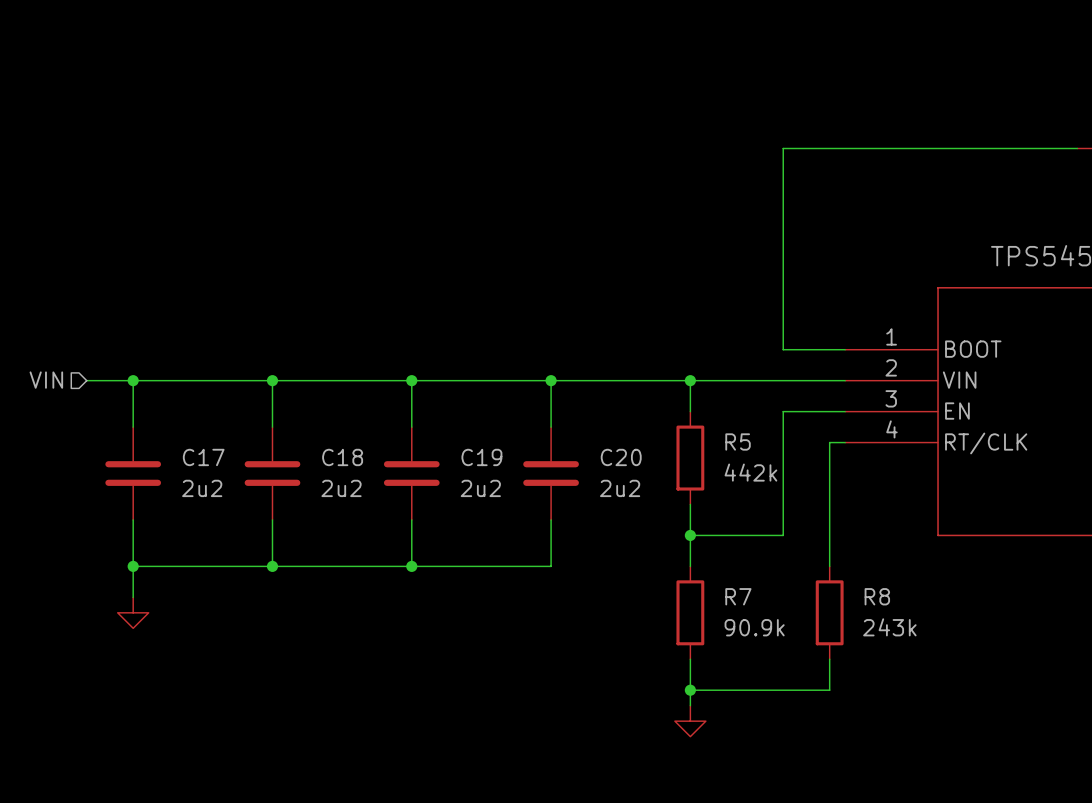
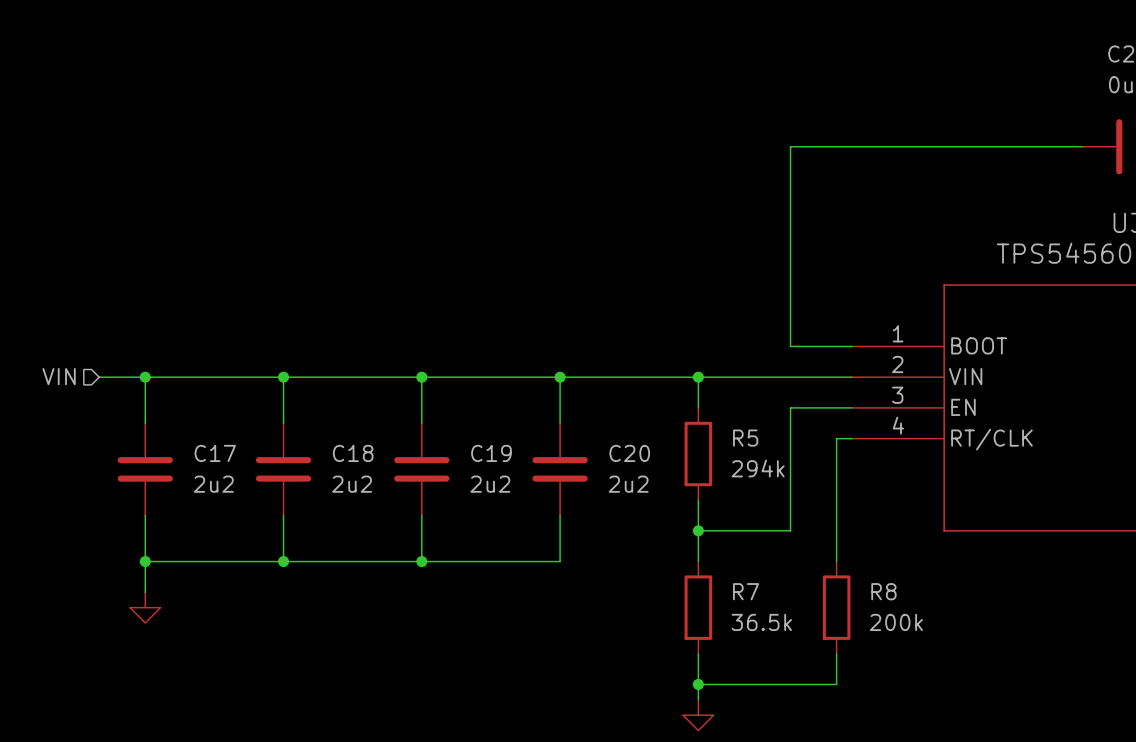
R5 value: 442k (750, 472) -> 294k (758, 468)
R7 value: 90.9k (754, 627) -> 36.5k (761, 622)
R8 value: 243k (889, 627) -> 200k (896, 622)

